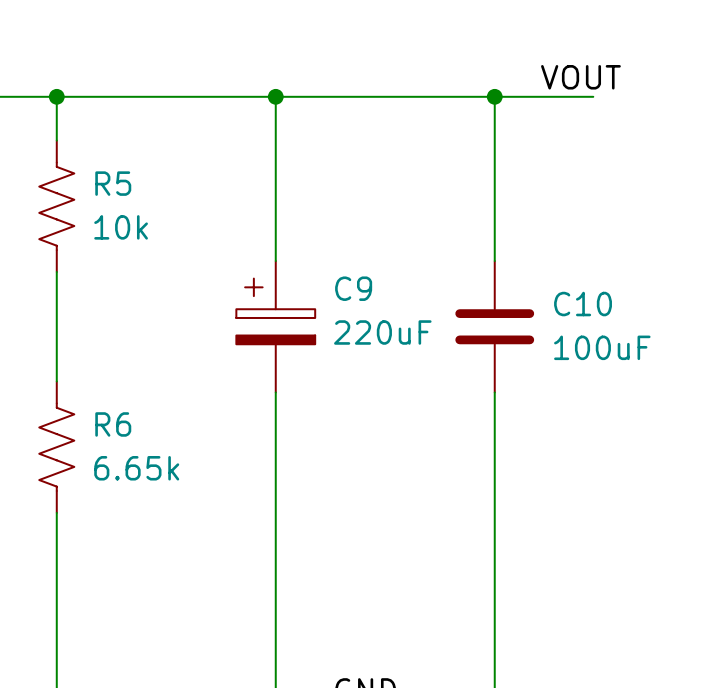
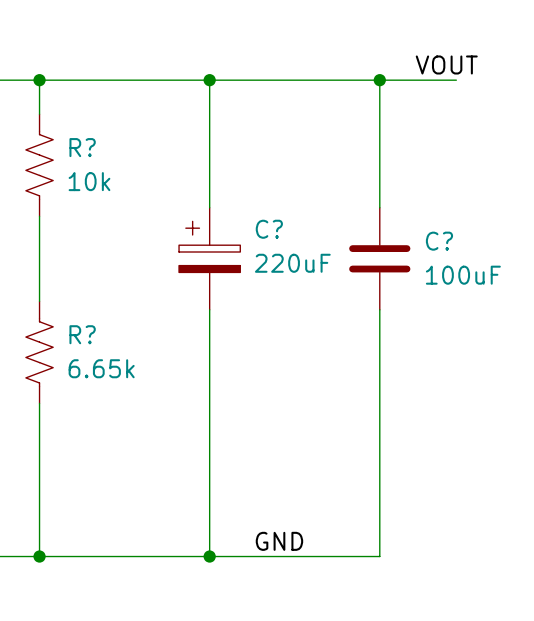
R5 name: R5 (113, 183) -> R? (82, 147)
C9 name: C9 (353, 288) -> C? (269, 229)
C10 name: C10 (583, 304) -> C? (439, 241)
R6 name: R6 (113, 424) -> R? (82, 334)

